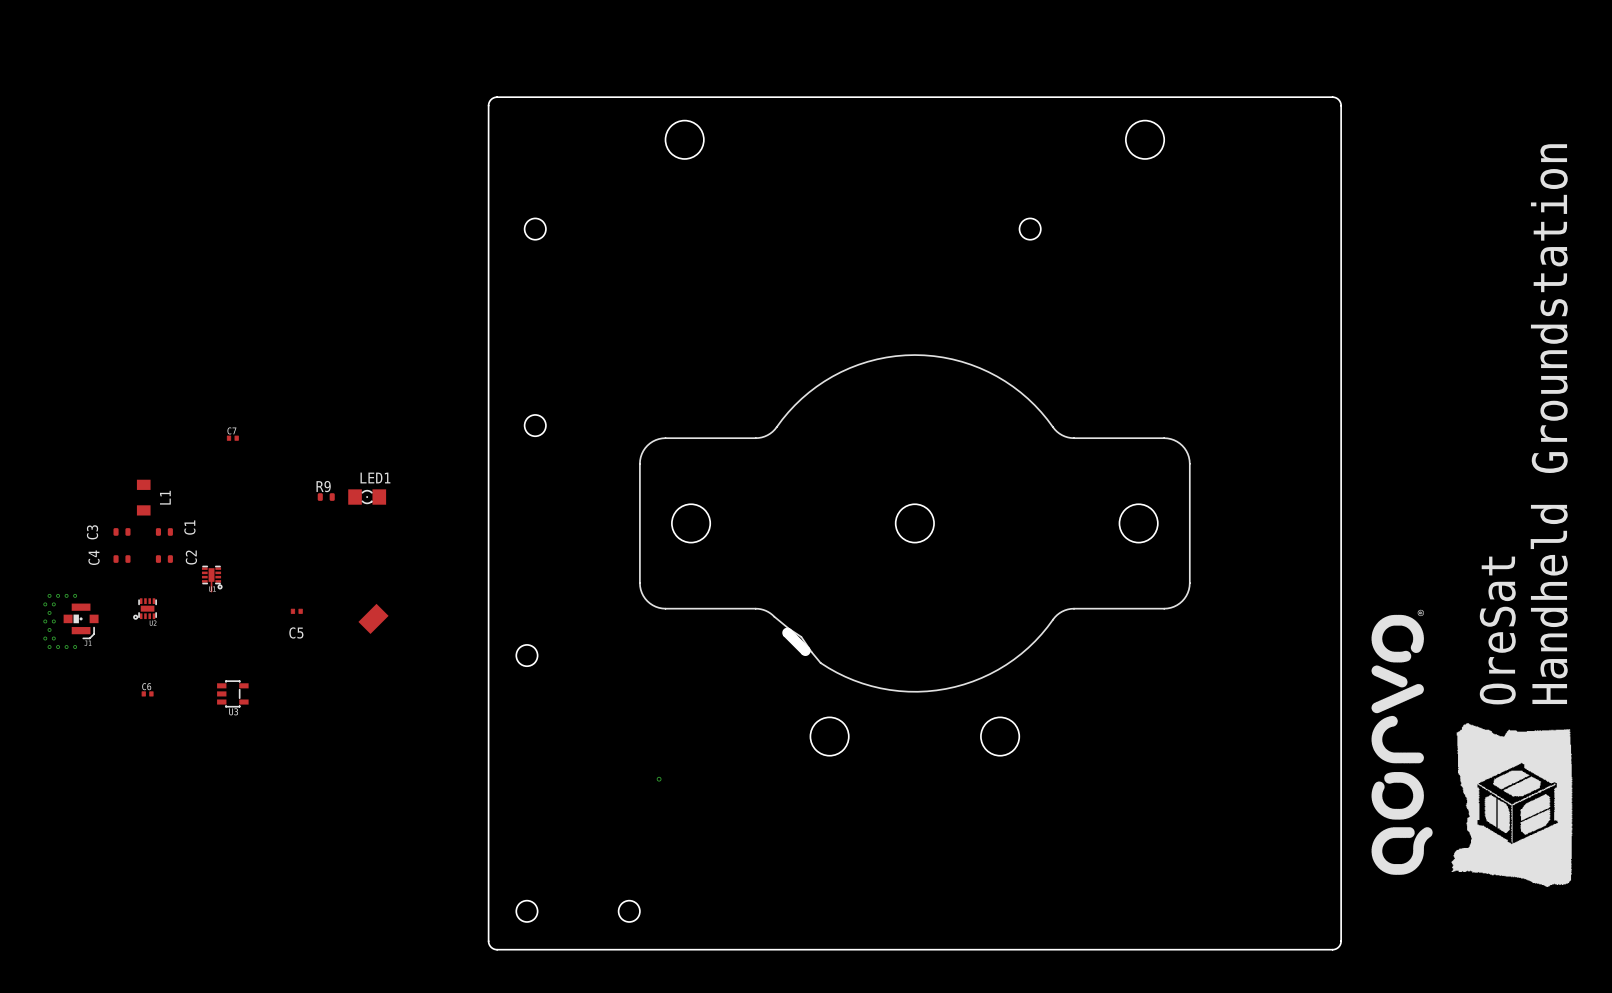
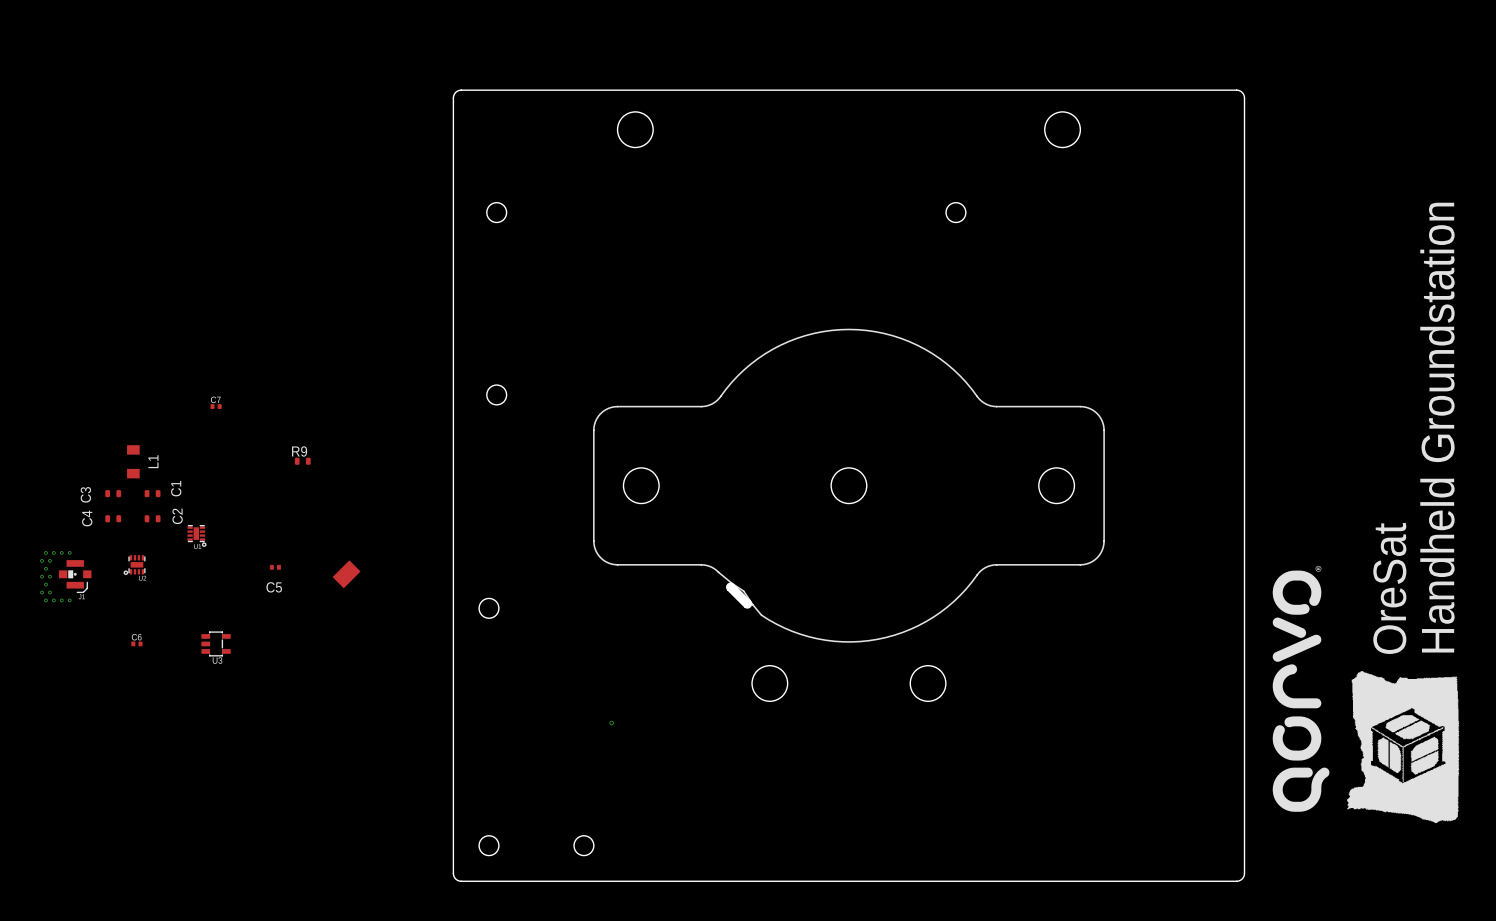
LED1: (367, 497) -> none
track: (211, 575) (211, 591) -> none

